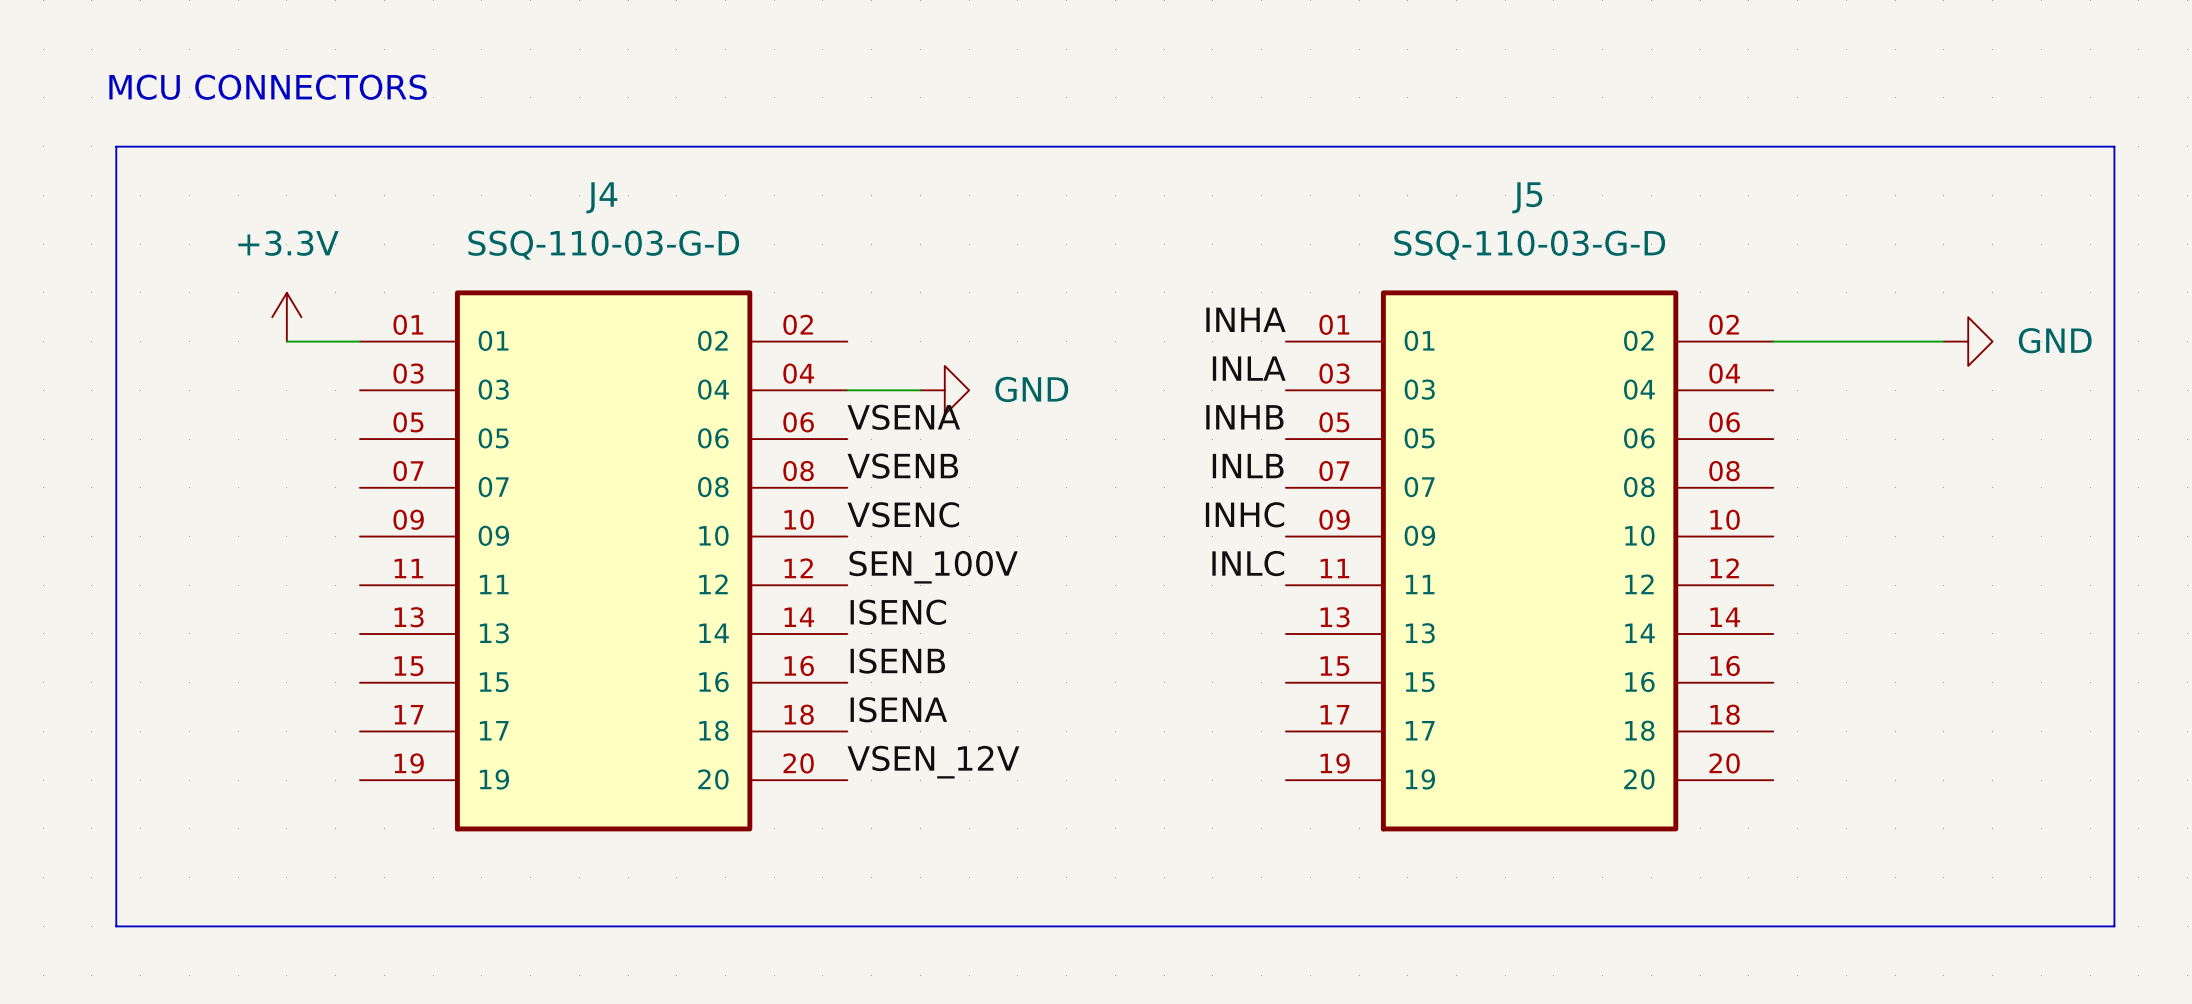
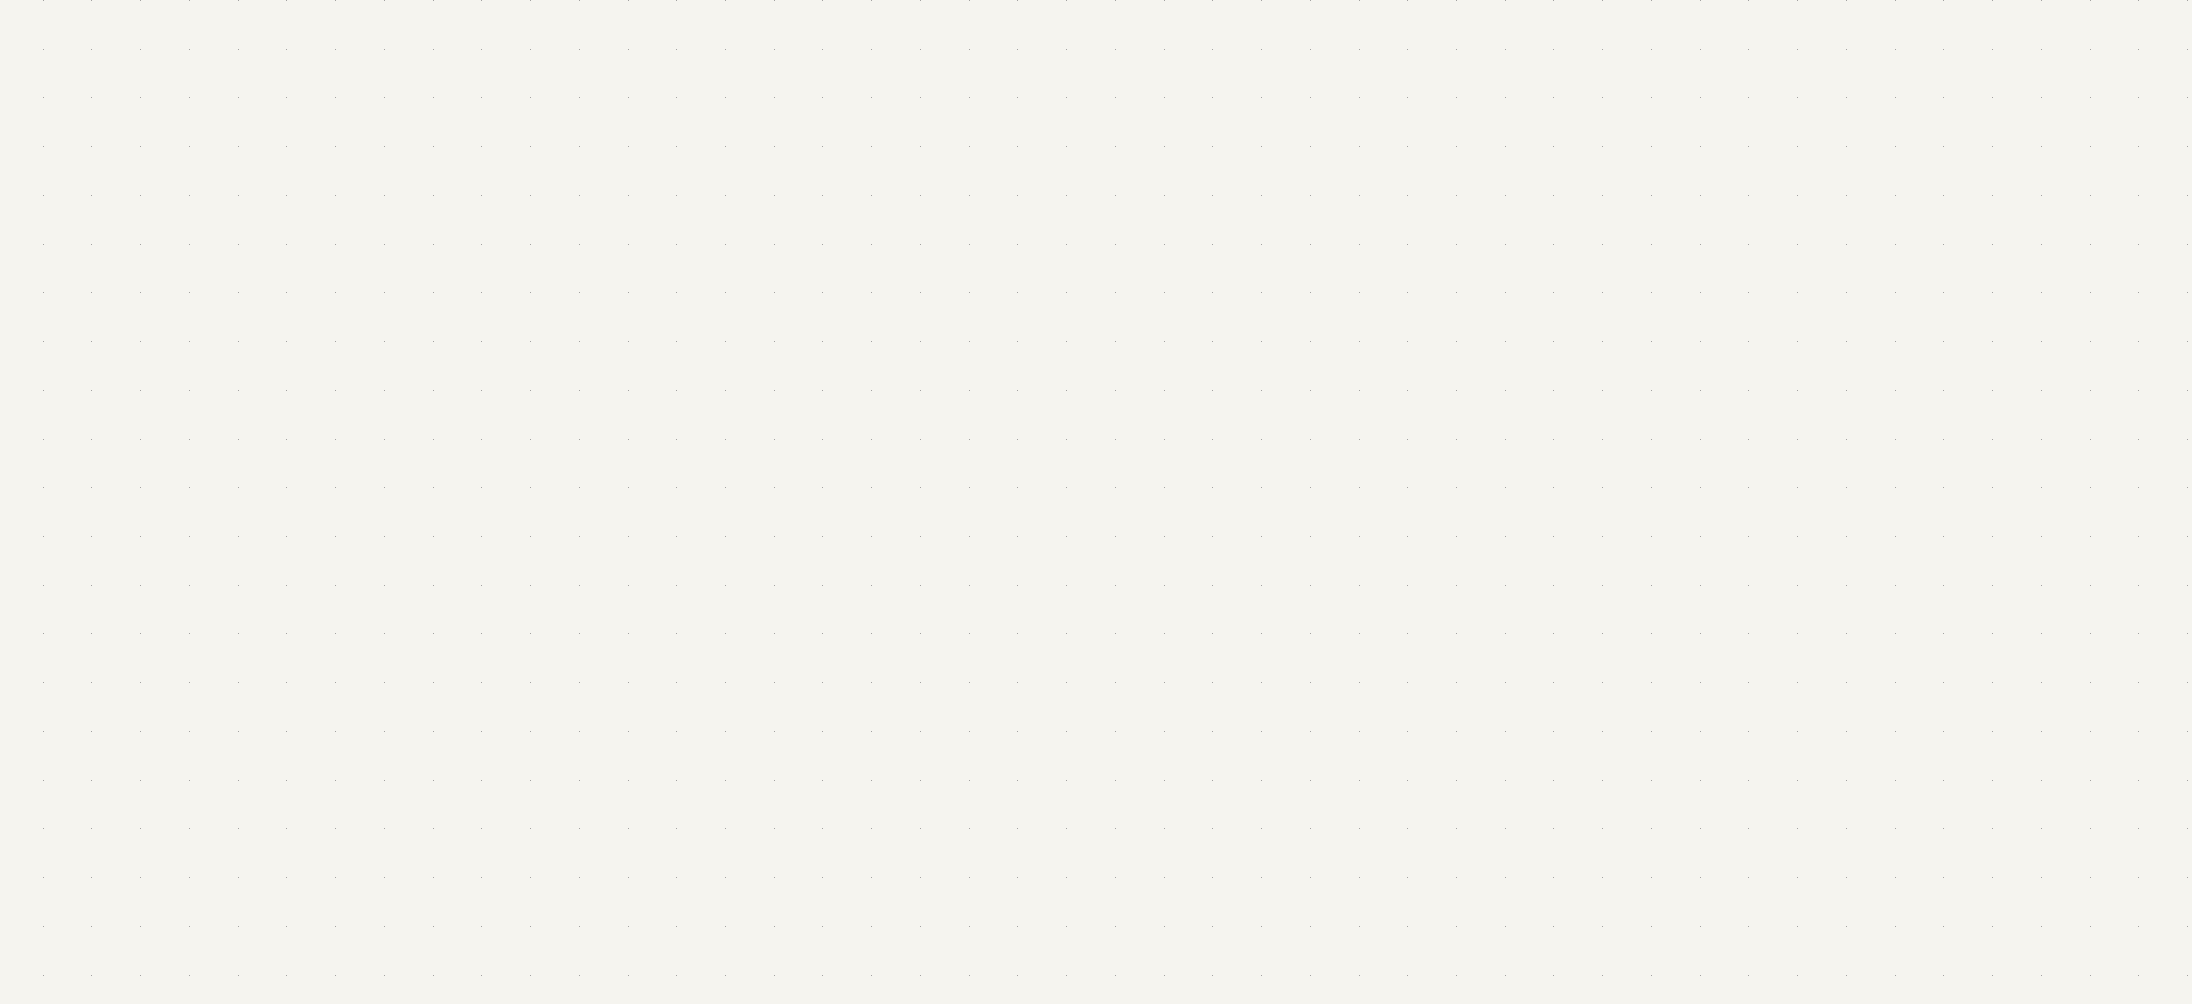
text: MCU CONNECTORS (268, 87) -> none
line: (116, 146) (2114, 146) (2114, 926) (116, 926) (116, 146) -> none
power symbol: +3.3V (286, 317) -> none
label: INHA (1246, 319) -> none
wire: (286, 341) (359, 341) -> none
wire: (1773, 341) (1943, 341) -> none
power symbol: GND (1968, 341) -> none
label: INLA (1249, 368) -> none
wire: (847, 390) (920, 390) -> none
power symbol: GND (944, 390) -> none
label: VSENA (903, 417) -> none
label: INHB (1244, 417) -> none
label: VSENB (902, 466) -> none
label: INLB (1248, 466) -> none
label: VSENC (903, 514) -> none
label: INHC (1244, 514) -> none
J4: SSQ-110-03-G-D (603, 560) -> none
J5: SSQ-110-03-G-D (1529, 560) -> none
label: INLC (1248, 563) -> none
label: SEN_100V (933, 567) -> none
label: ISENC (898, 612) -> none
label: ISENB (897, 661) -> none
label: ISENA (898, 709) -> none
label: VSEN_12V (933, 762) -> none

